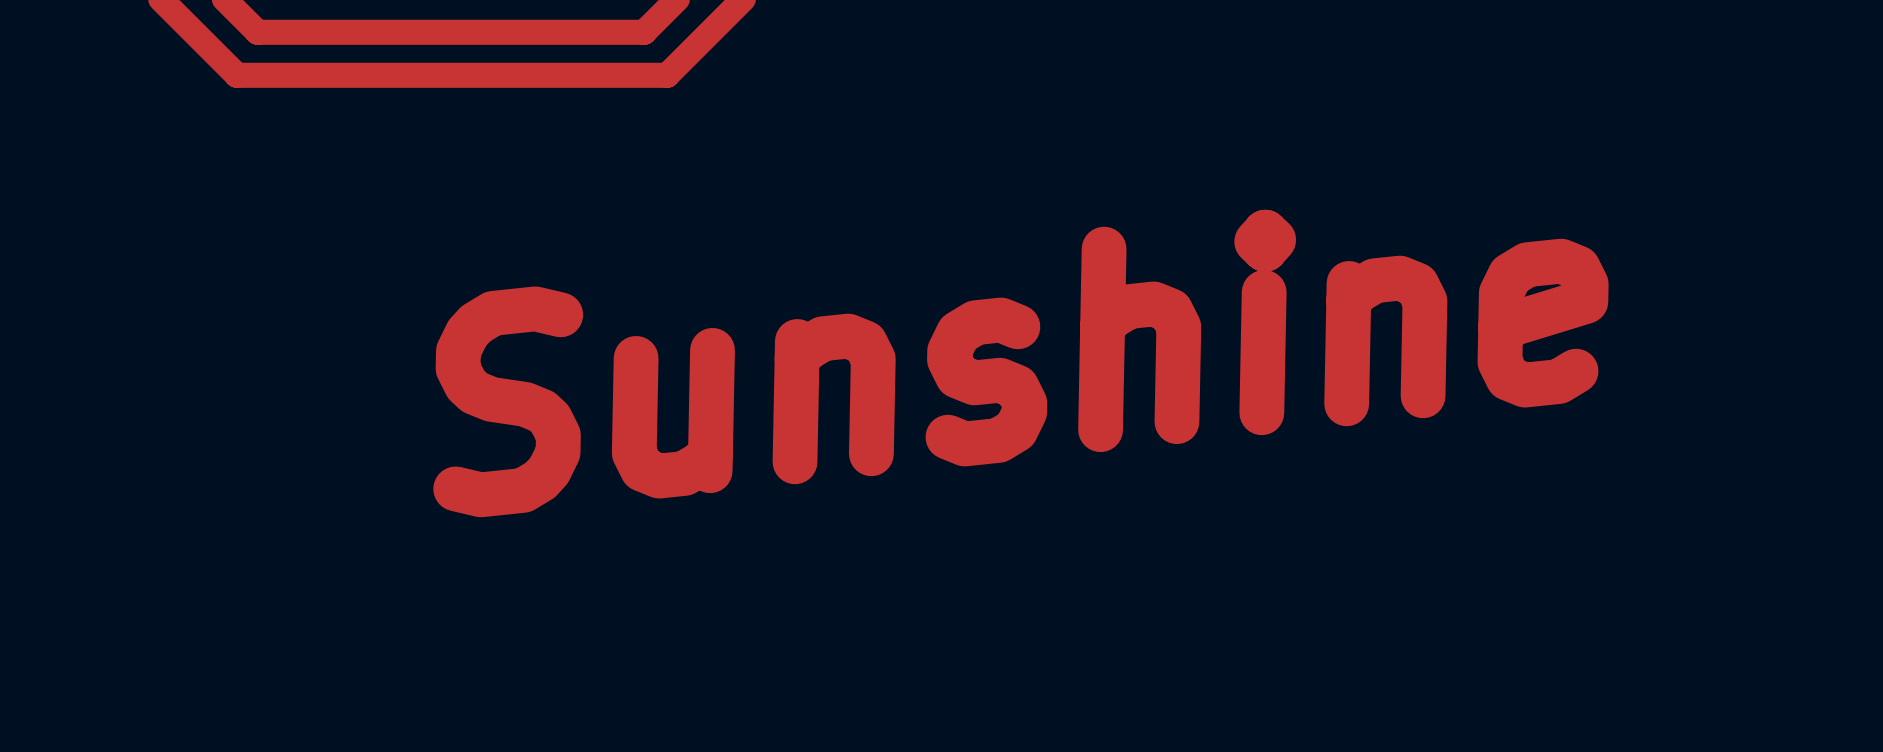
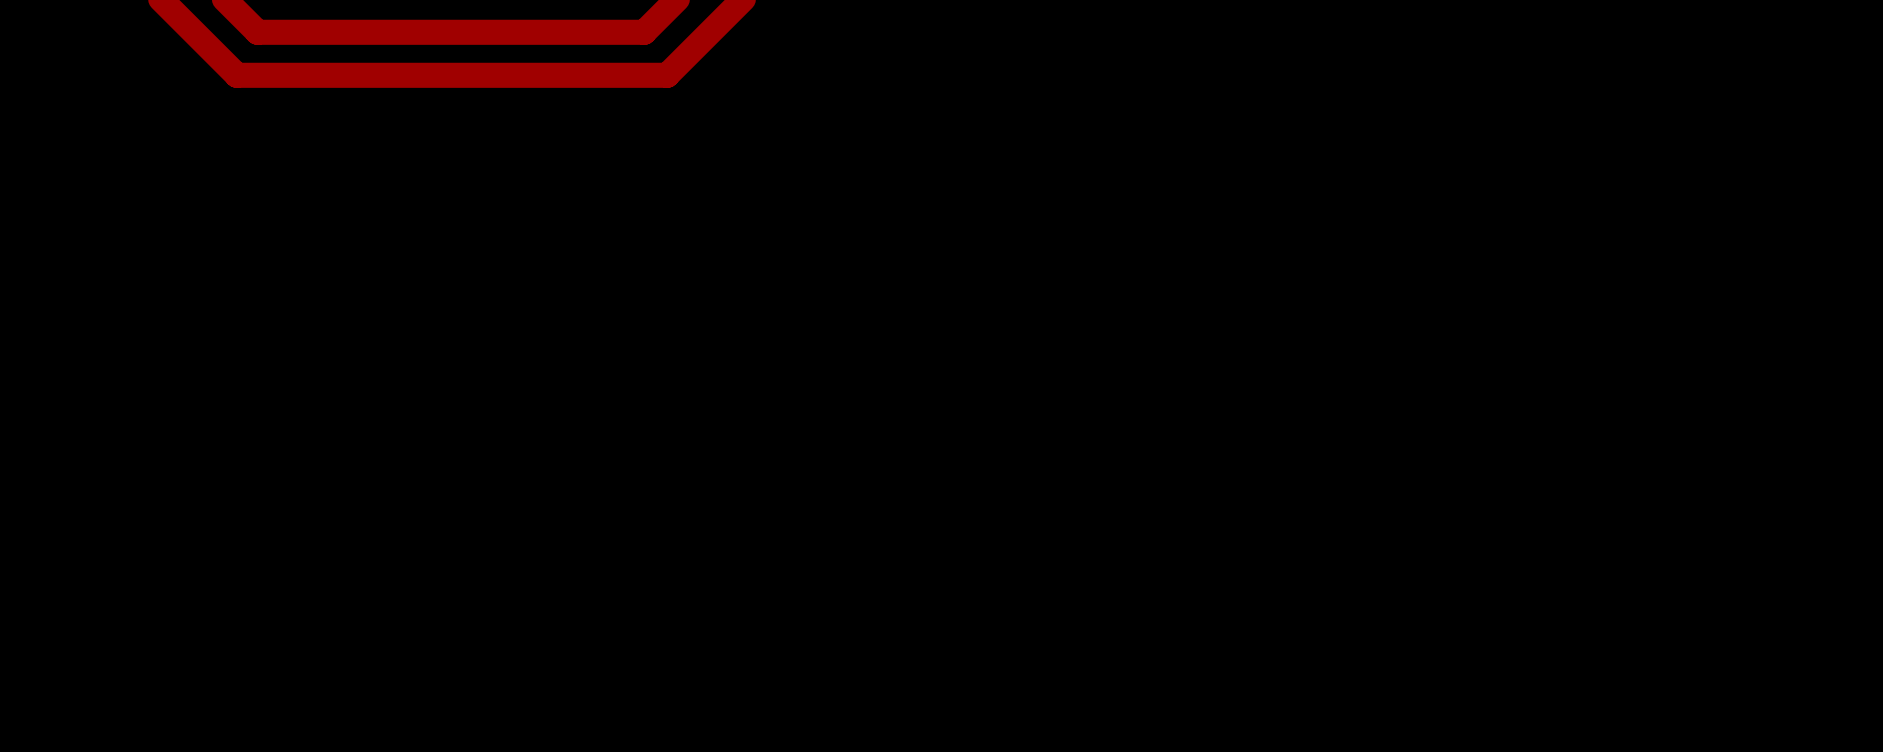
text: Sunshine (1020, 363) -> none

